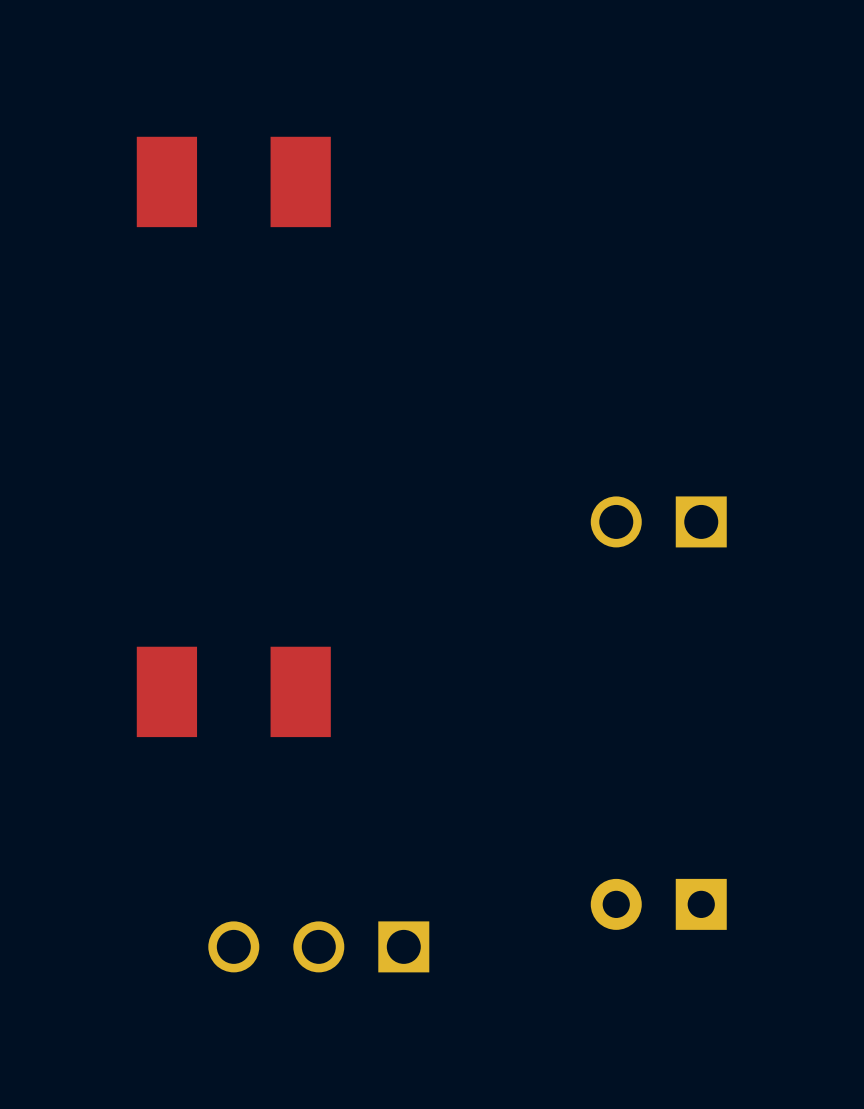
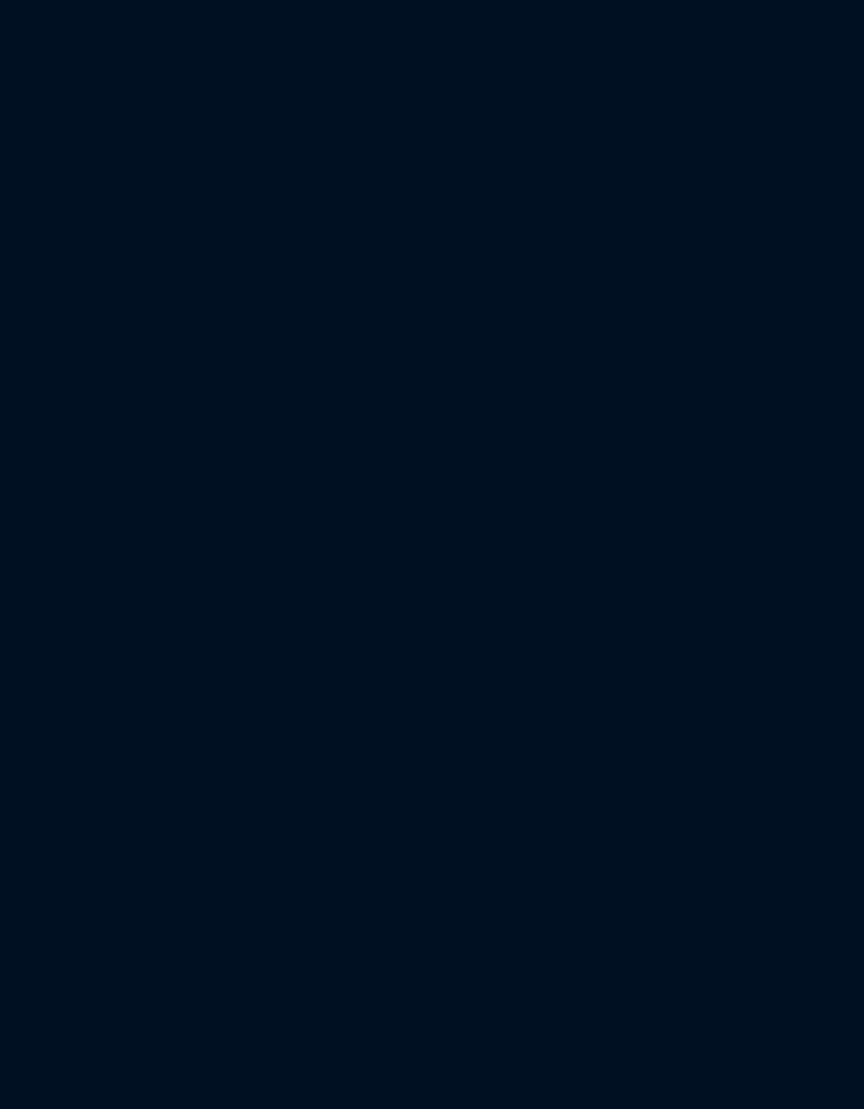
part: (233, 181) -> none
part: (658, 521) -> none
part: (233, 691) -> none
part: (658, 904) -> none
part: (318, 946) -> none

